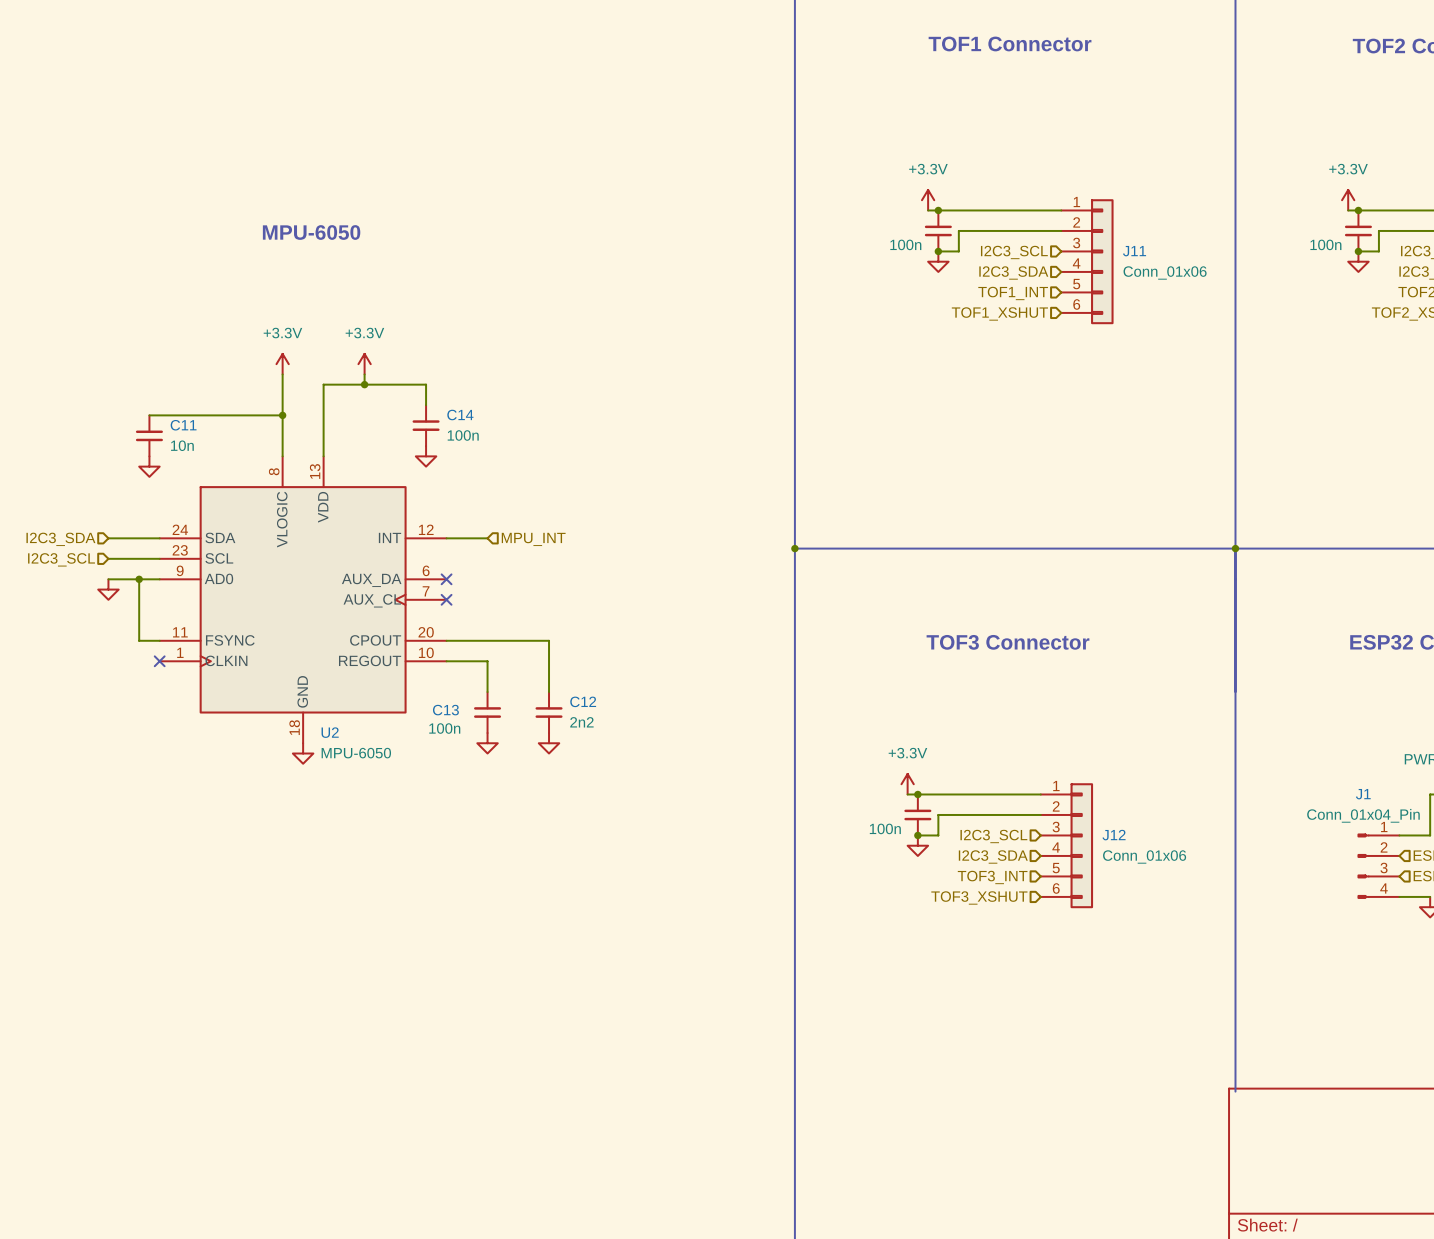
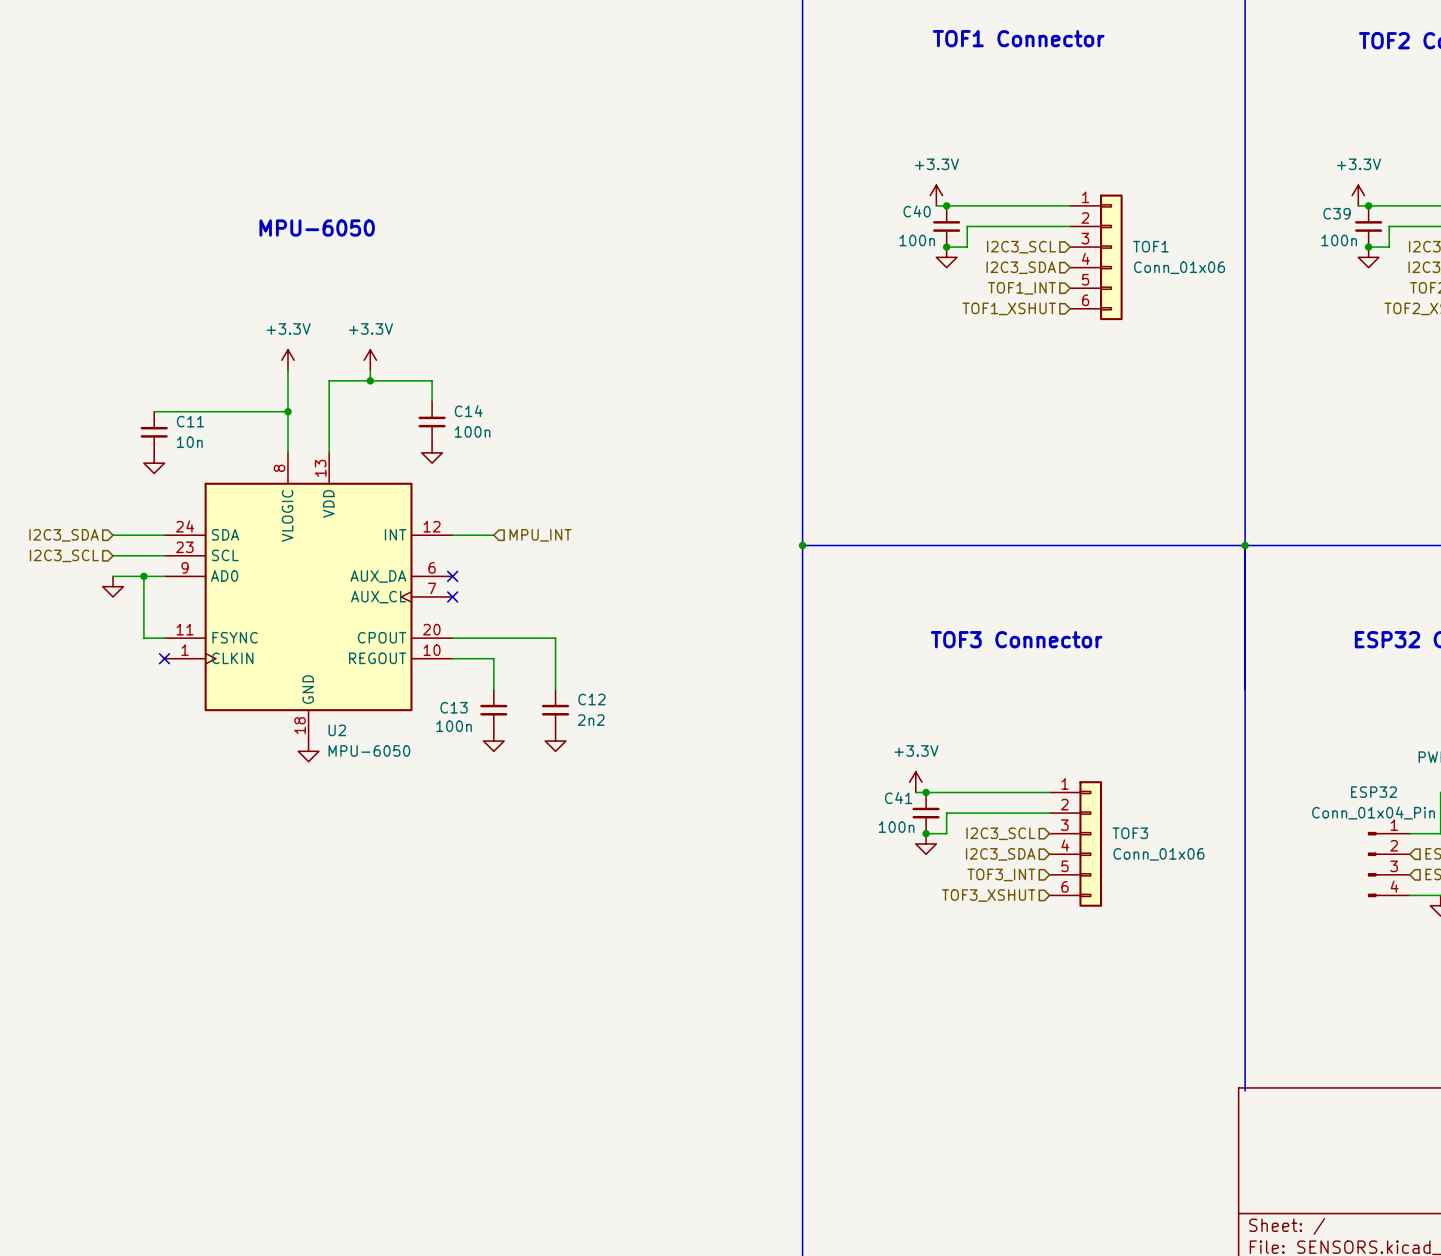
C40 name: none -> C40 (917, 211)
C39 name: none -> C39 (1337, 213)
J11 name: J11 (1134, 251) -> TOF1 (1150, 246)
J1 name: J1 (1363, 794) -> ESP32 (1374, 792)
C41 name: none -> C41 (898, 798)
J12 name: J12 (1114, 835) -> TOF3 (1130, 833)

